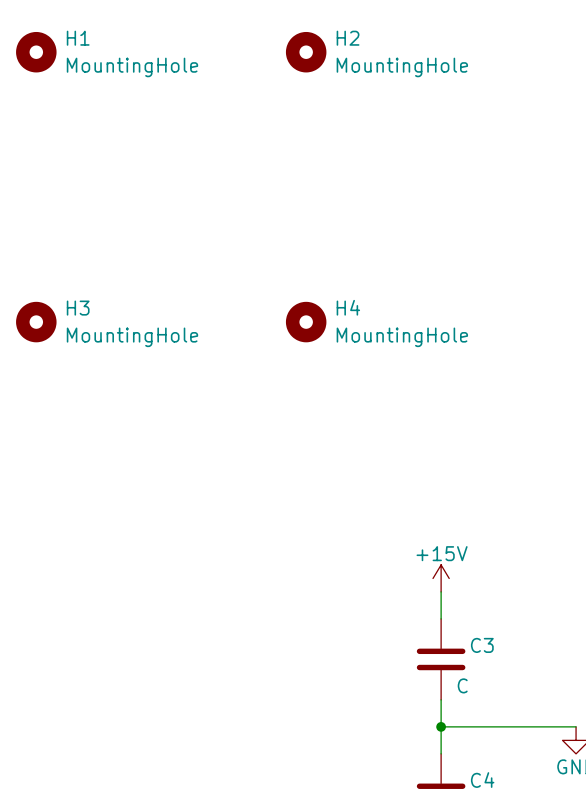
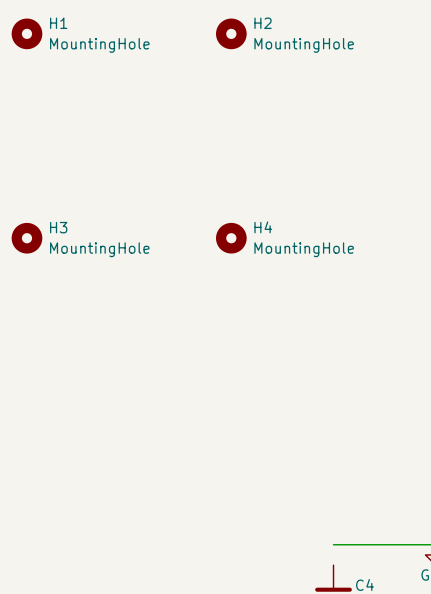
power symbol: +15V (441, 578) -> none
wire: (441, 591) (441, 618) -> none
C3: C (441, 659) -> none
wire: (441, 699) (441, 753) -> none
junction: (441, 726) -> none

